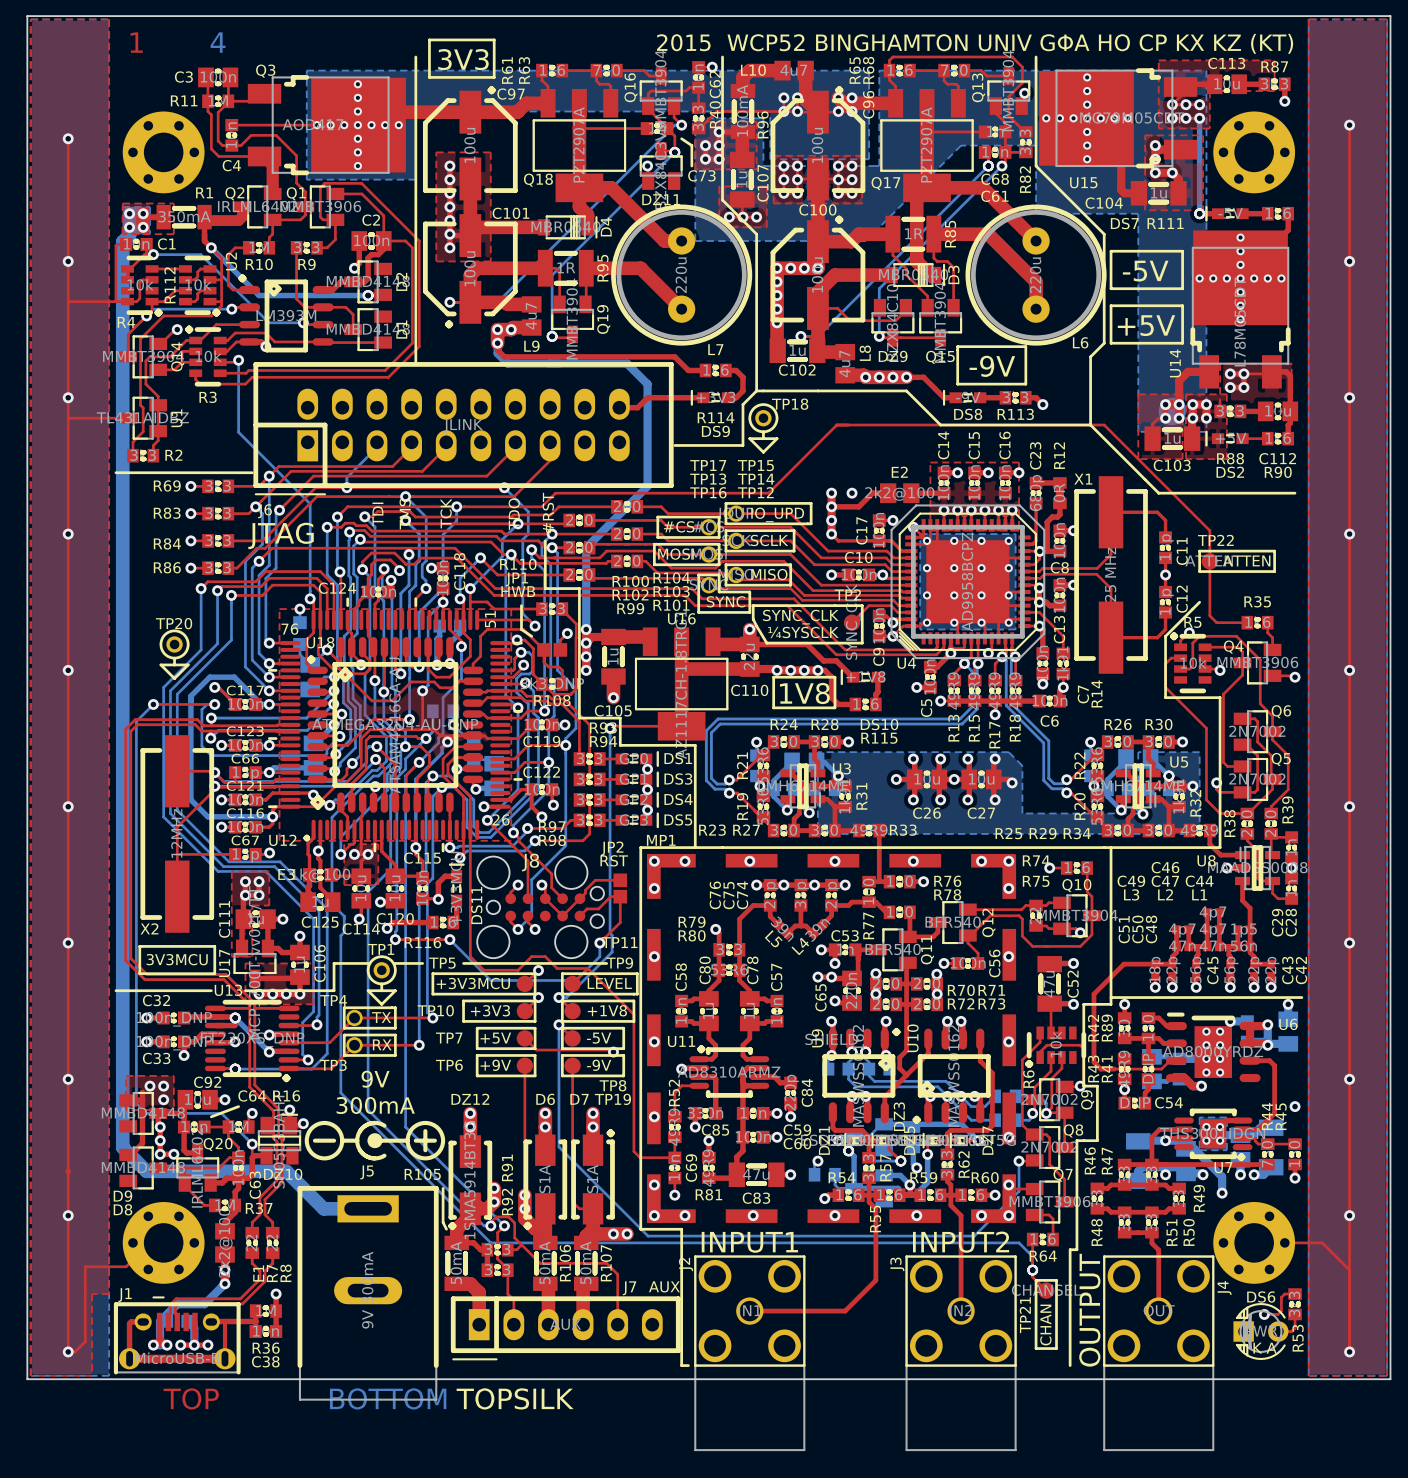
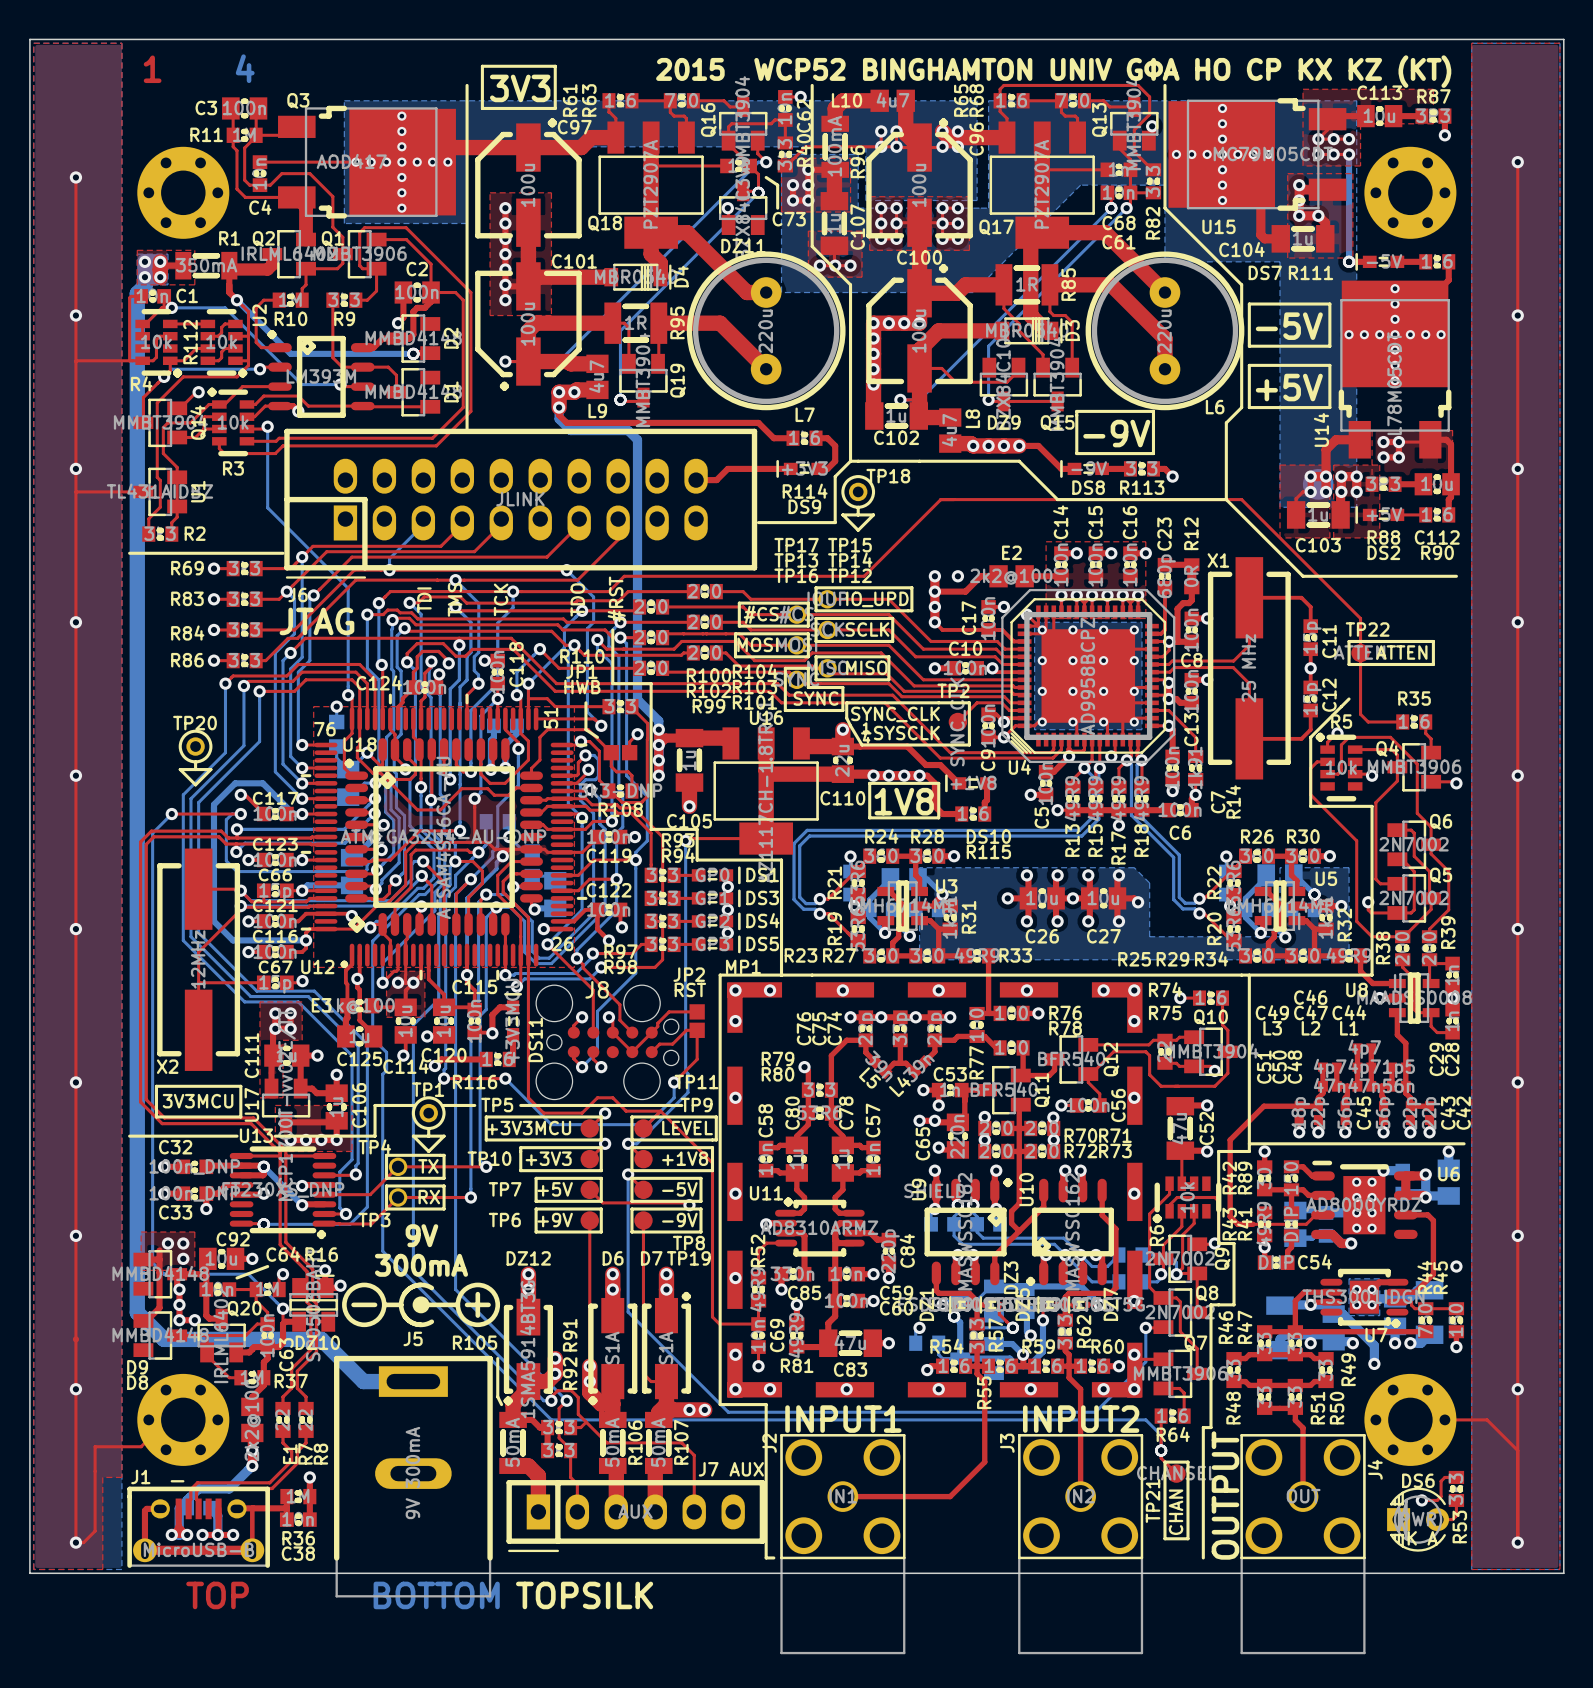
bottom track: (558, 363) (627, 363) (647, 384) (647, 486) (586, 547) (586, 621) -> (628, 430) (637, 439) (637, 699) (658, 720)

